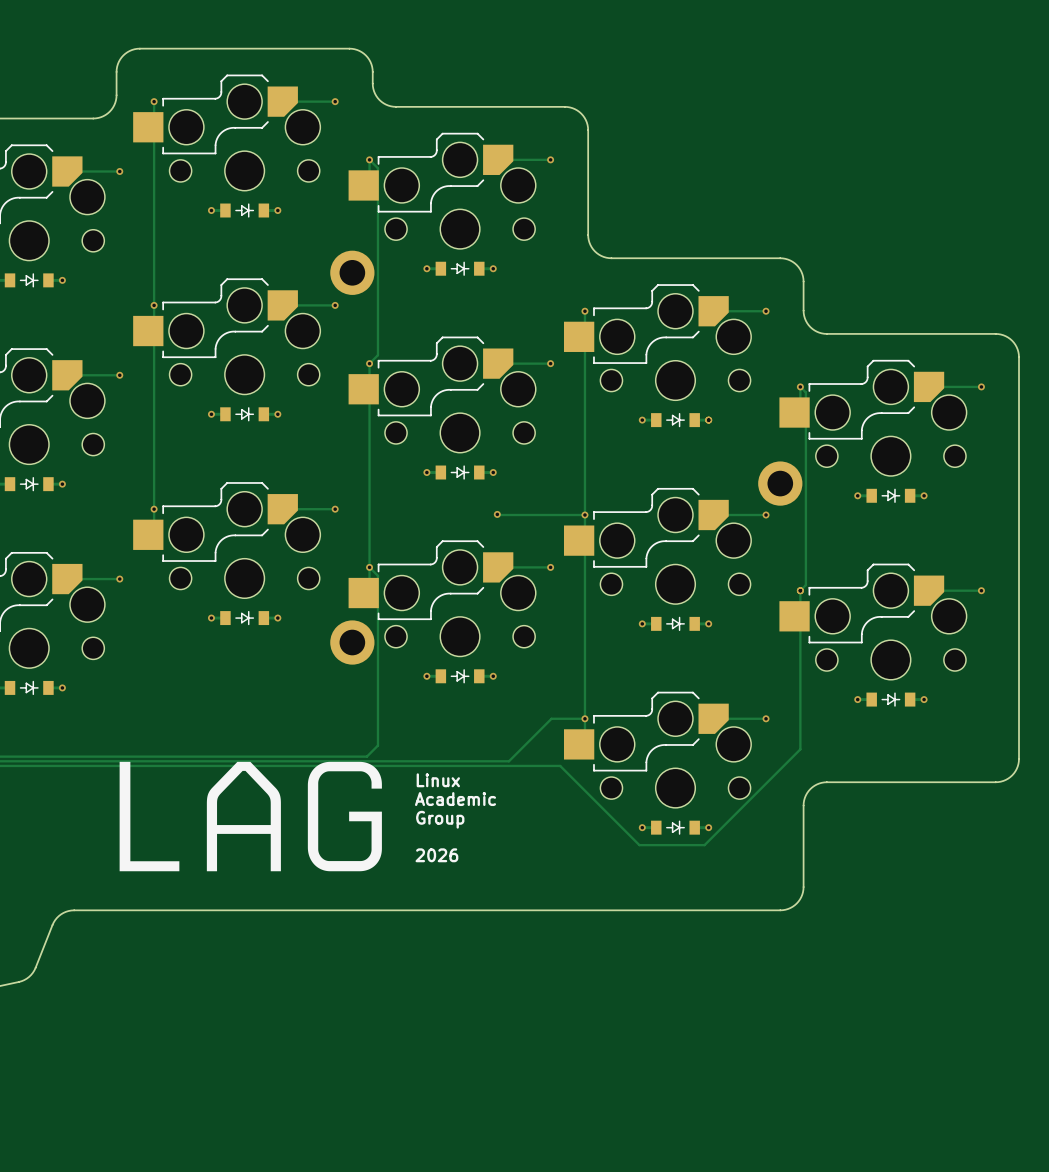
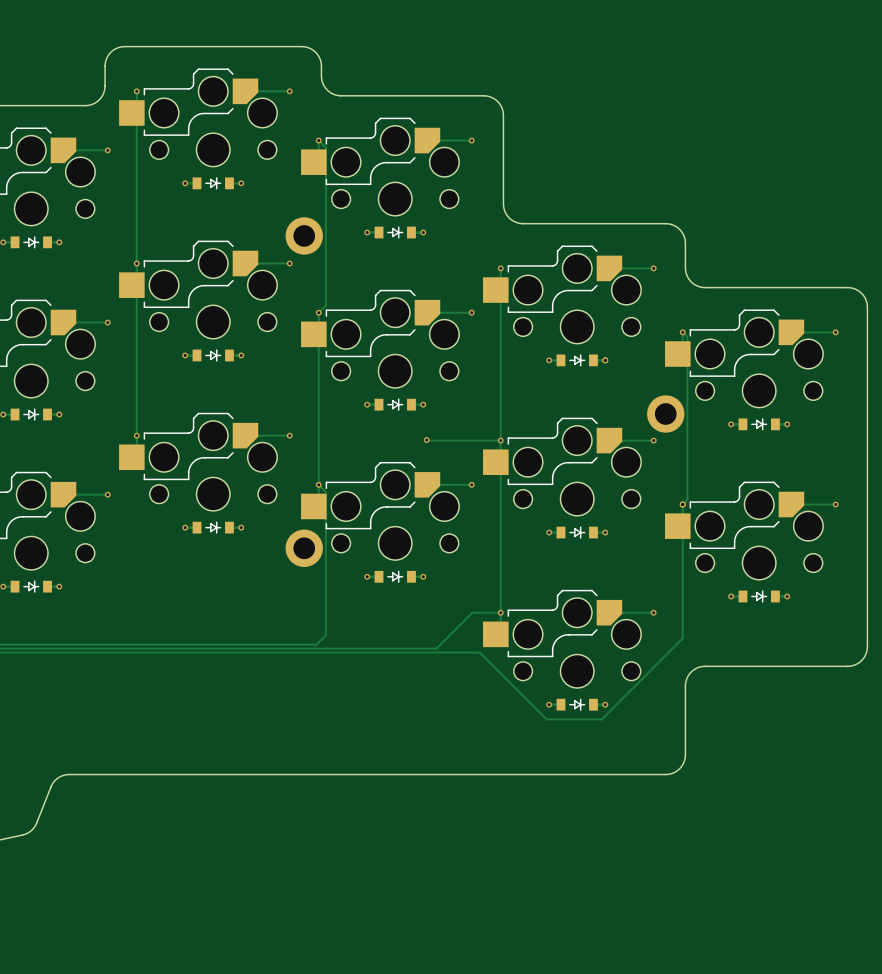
drawing: [119, 761, 180, 872] -> none
drawing: [206, 761, 281, 872] -> none
drawing: [307, 761, 382, 872] -> none
text: Linux (438, 780) -> none
text: Academic (455, 799) -> none
text: Group (440, 819) -> none
text: 2026 (436, 855) -> none

